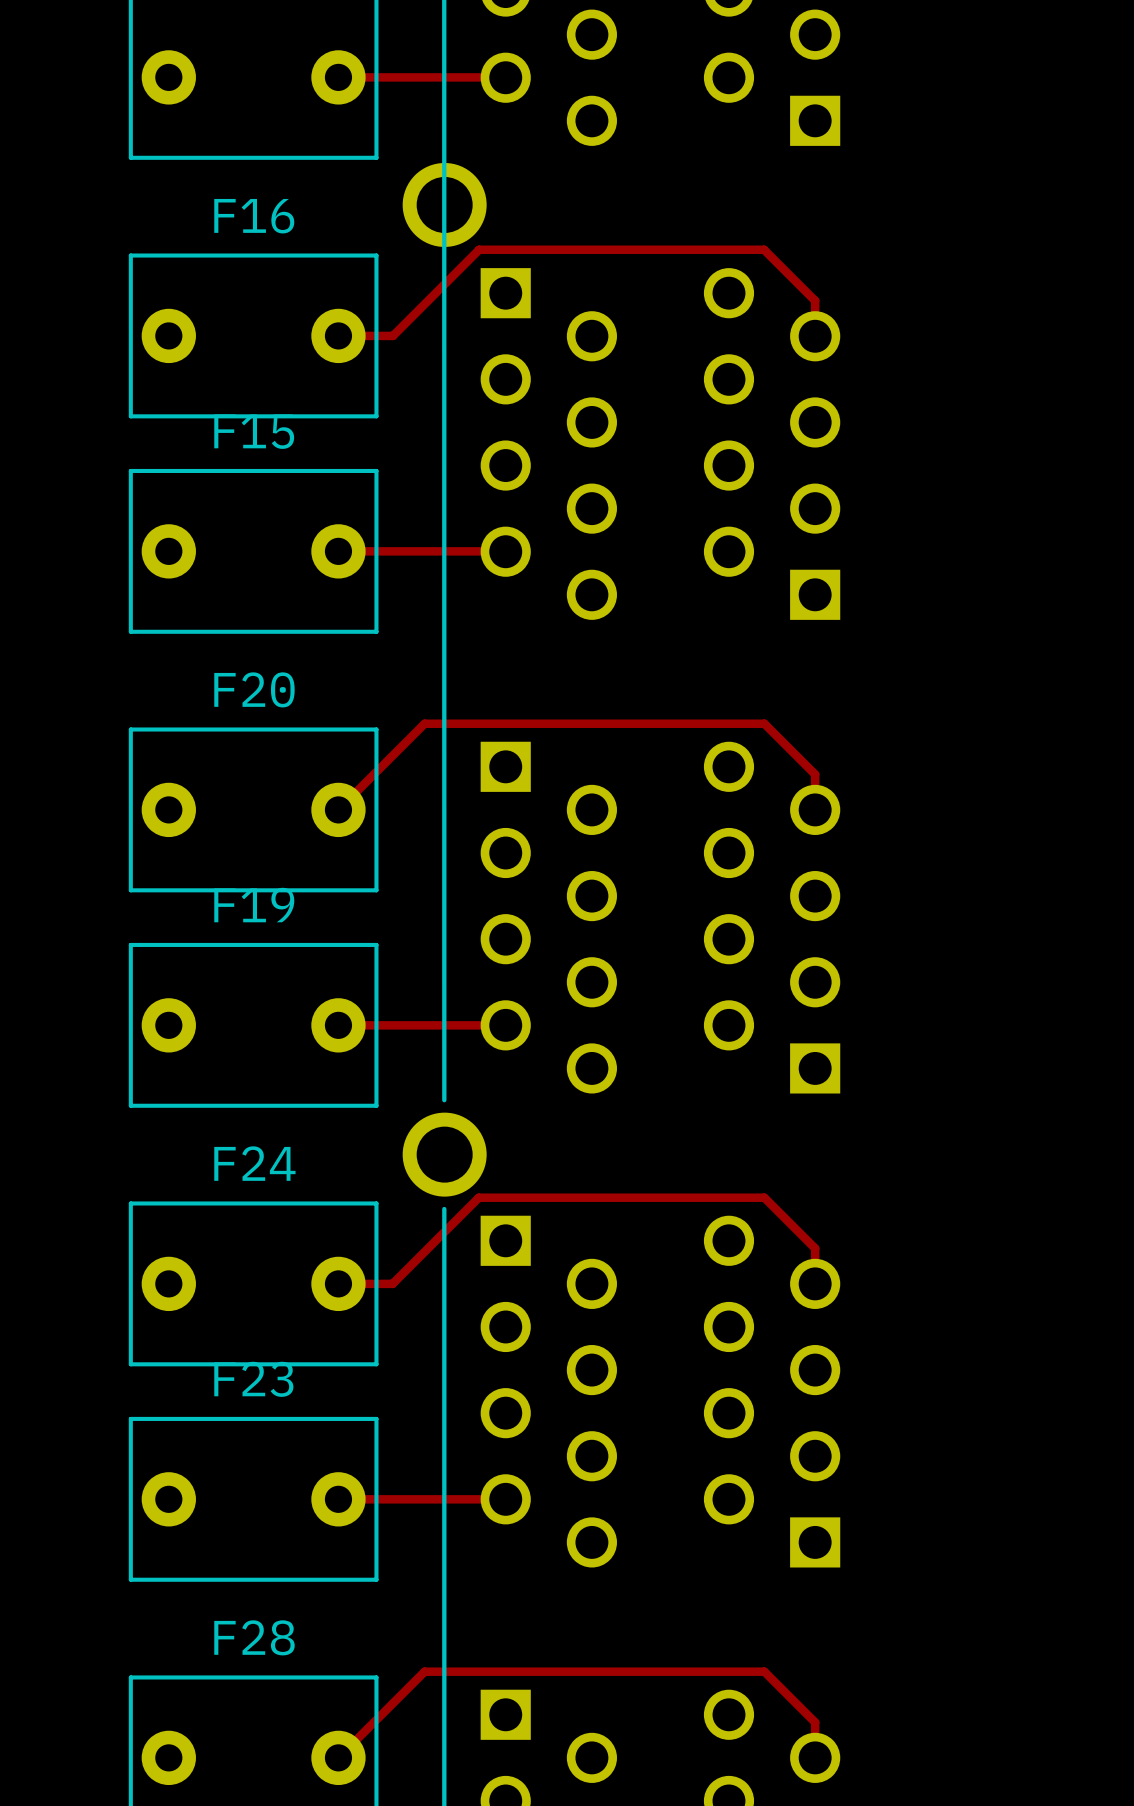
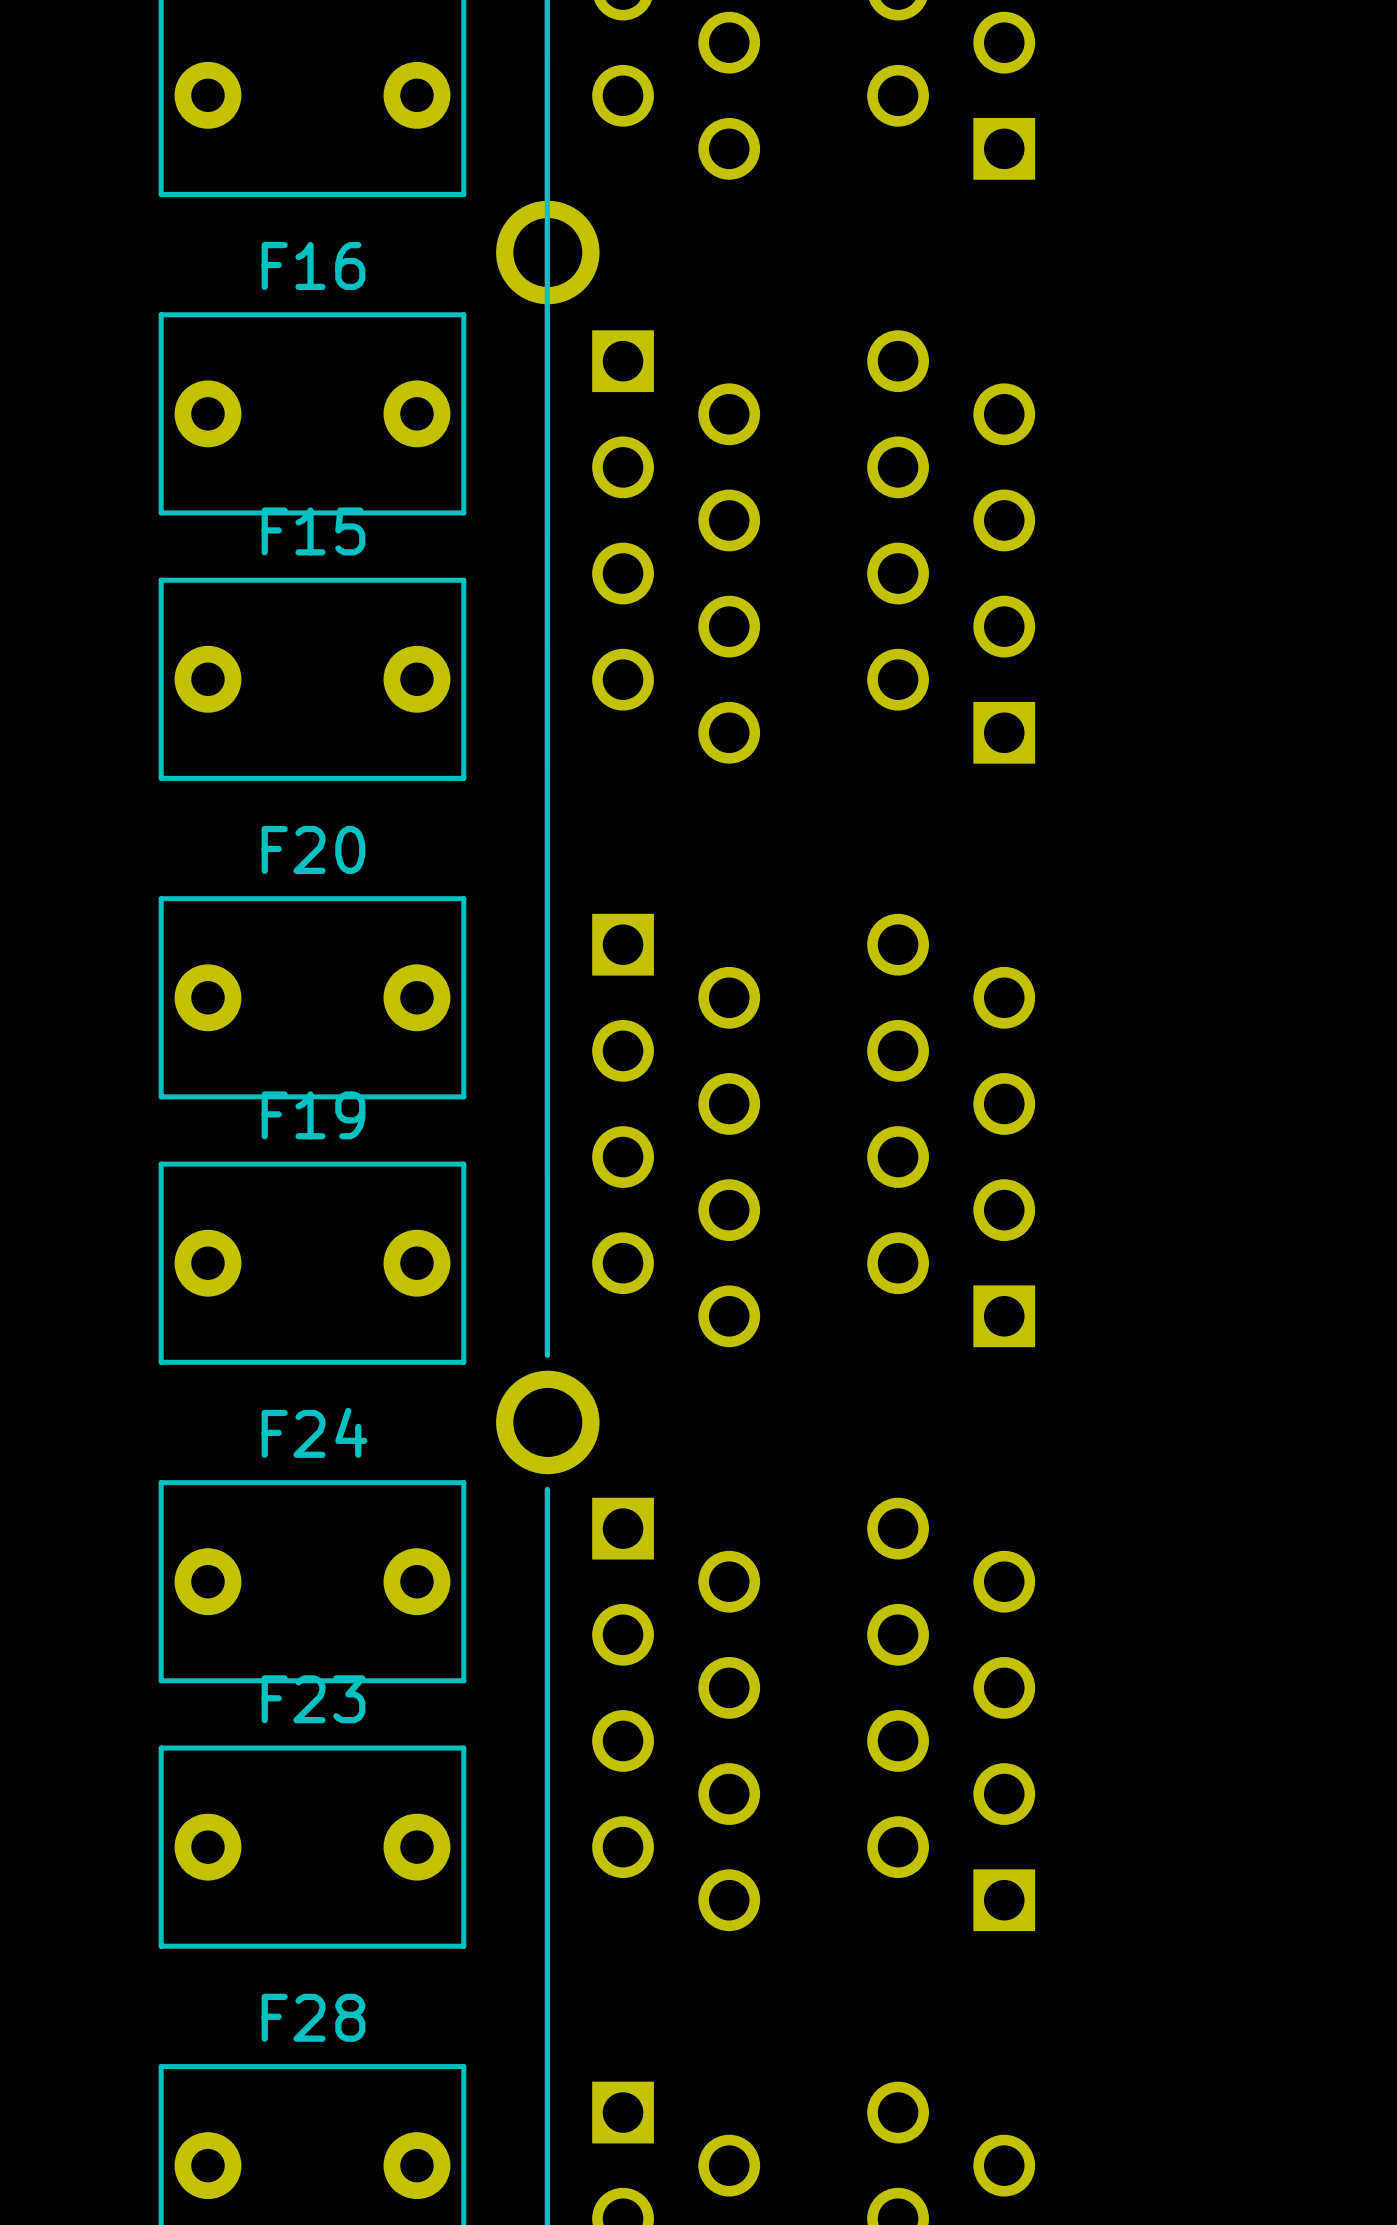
top track: (338, 77) (505, 77) -> none
top track: (338, 335) (392, 335) (479, 249) (764, 249) (815, 300) (815, 336) -> none
top track: (338, 551) (505, 551) -> none
top track: (338, 809) (424, 723) (764, 723) (815, 774) (815, 809) -> none
top track: (338, 1025) (505, 1025) -> none
top track: (338, 1283) (392, 1283) (478, 1197) (764, 1197) (815, 1248) (815, 1283) -> none
top track: (338, 1499) (505, 1499) -> none
top track: (338, 1757) (424, 1671) (764, 1671) (815, 1722) (815, 1757) -> none

